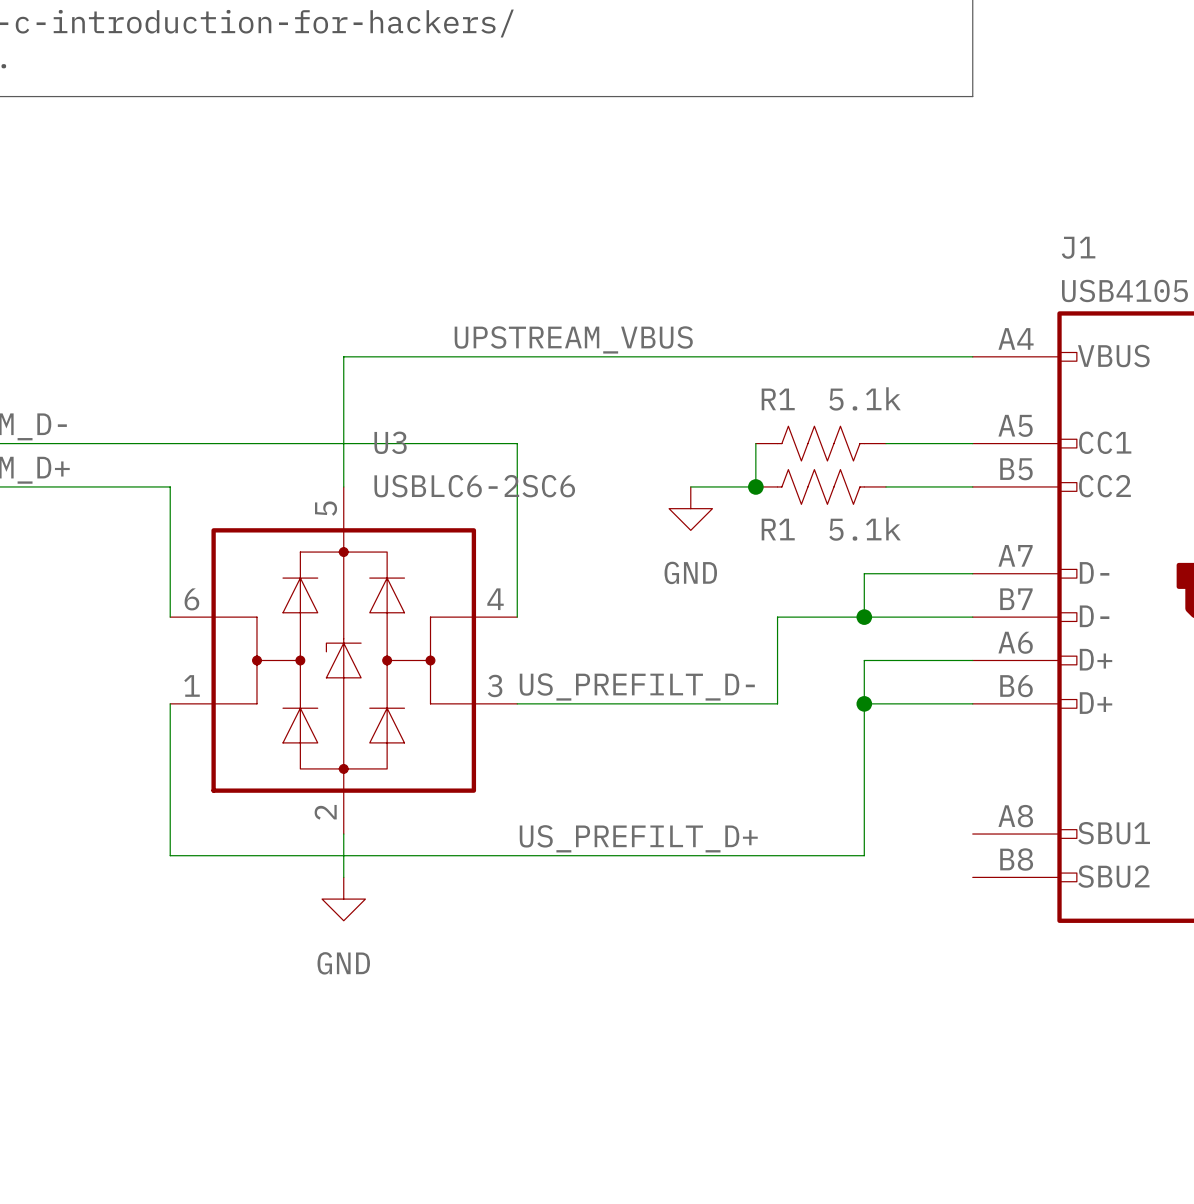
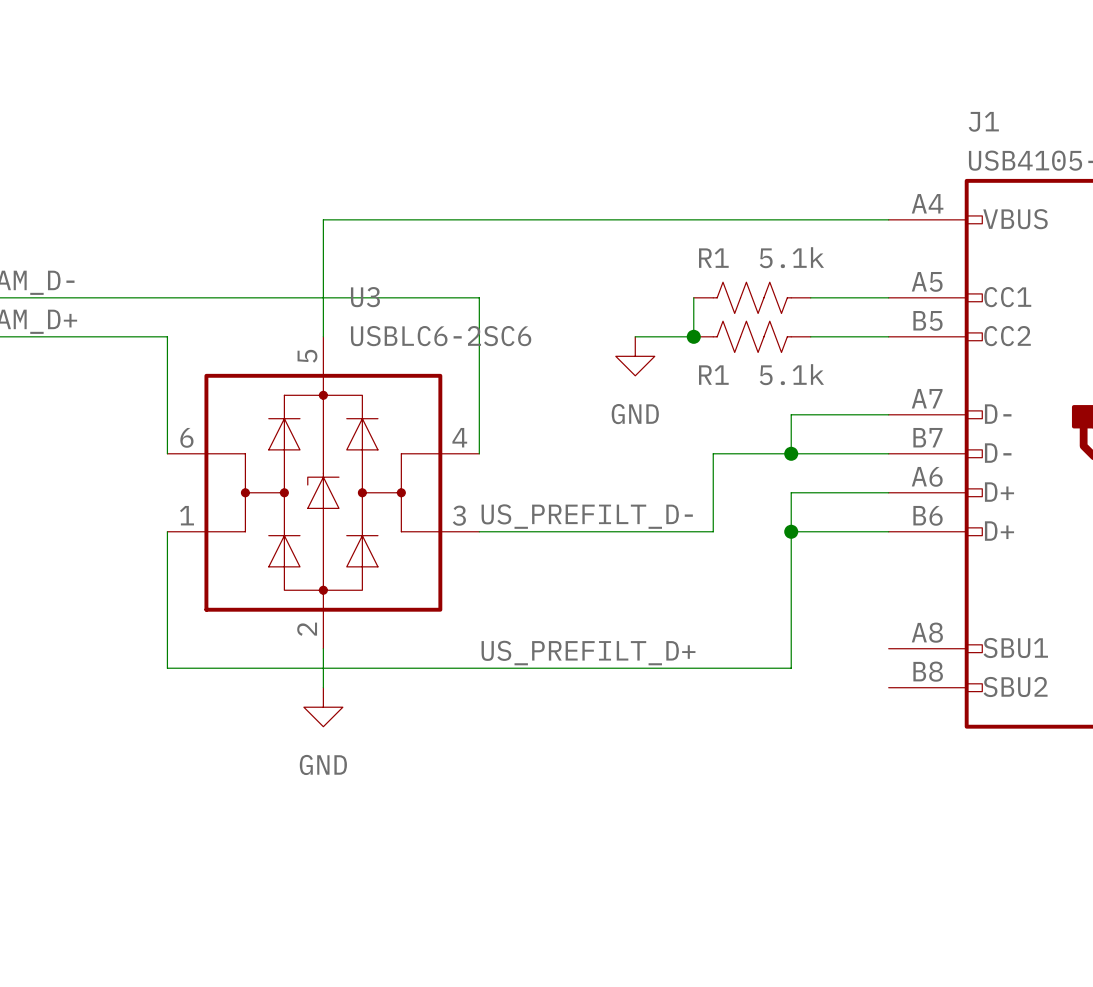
label: UPSTREAM_VBUS (573, 339) -> none

